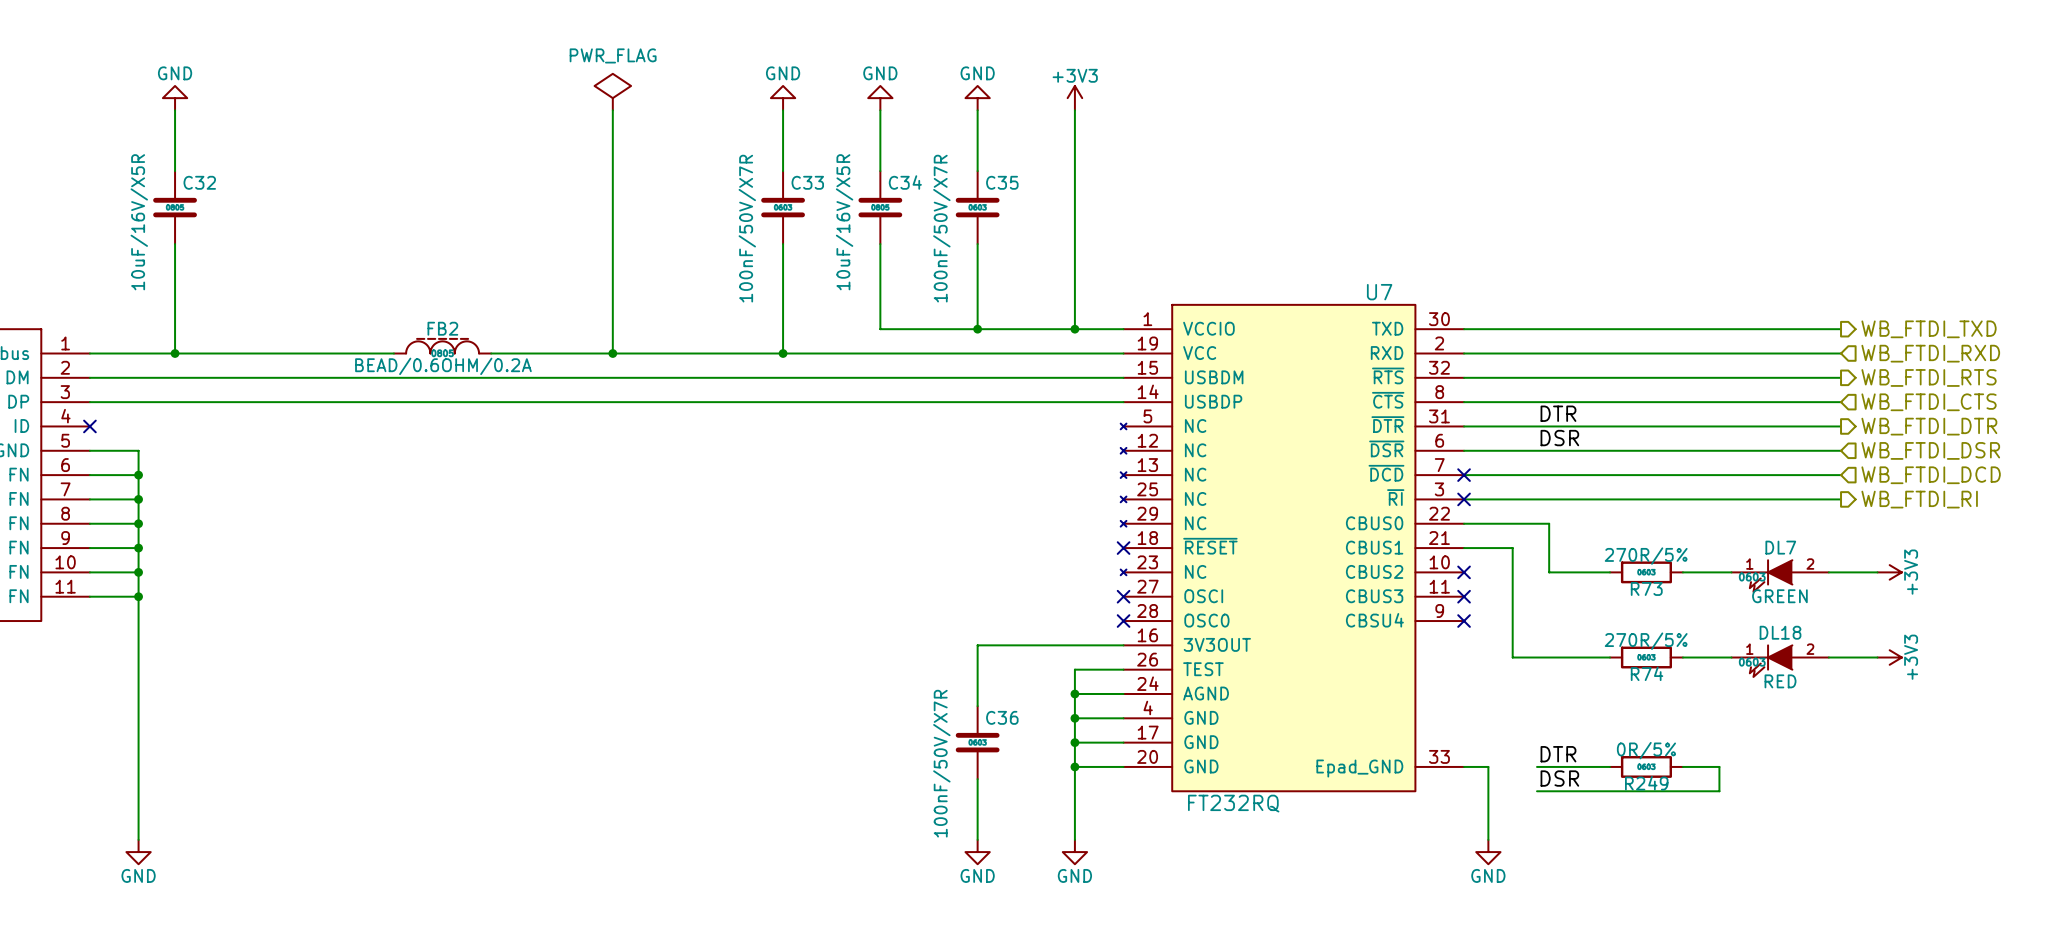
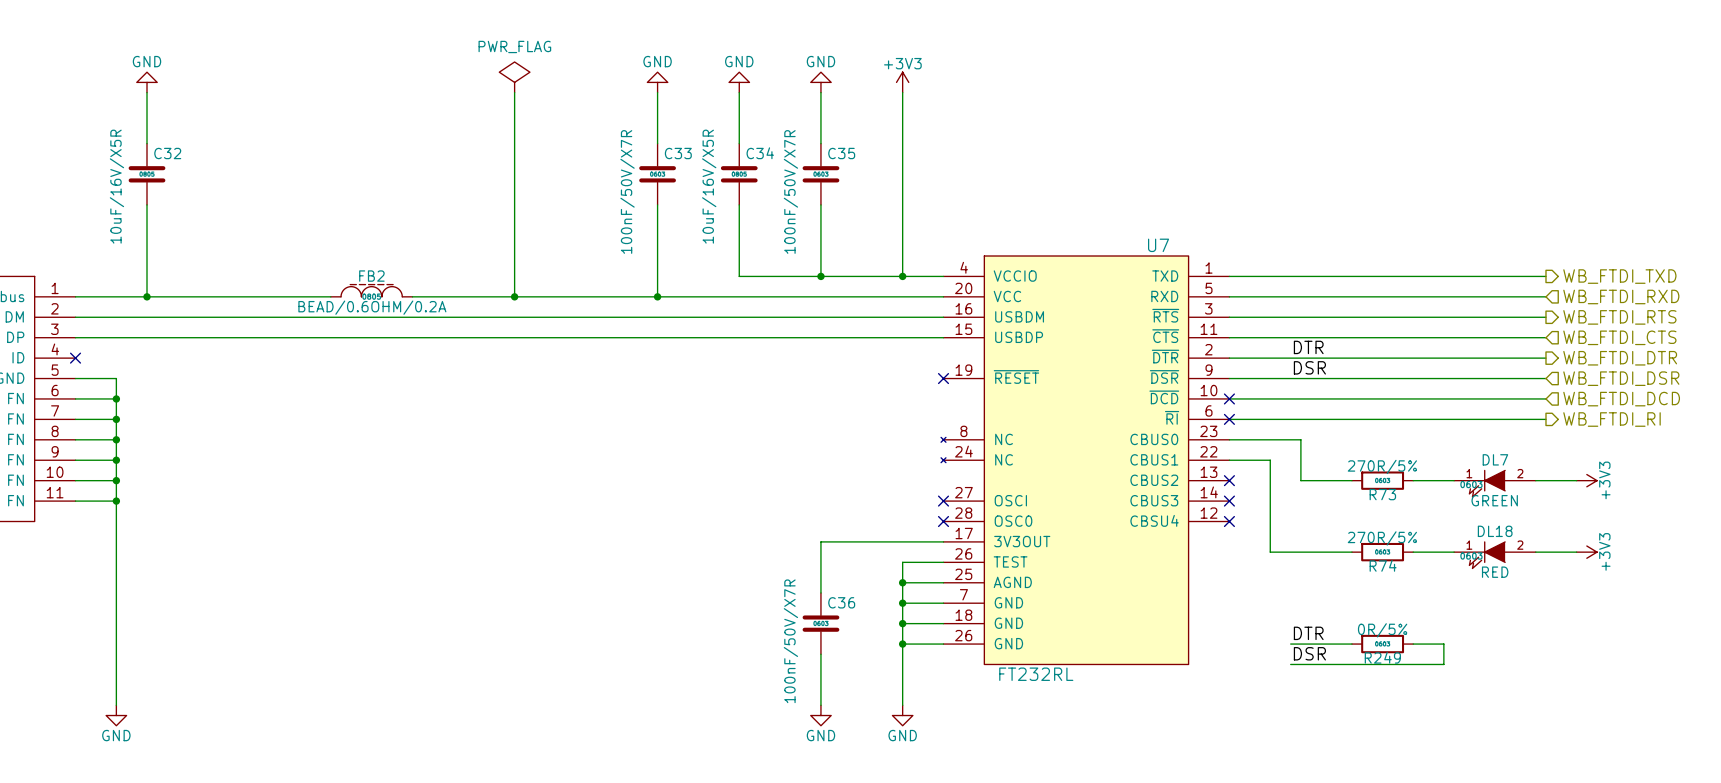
U7 symbol: [1120, 304, 1465, 792] -> [941, 256, 1230, 665]
no-connect mark: none -> (943, 378)
no-connect mark: (1123, 548) -> none
wire: (1464, 766) (1488, 766) (1488, 839) -> none
U7 value: FT232RQ (1233, 803) -> FT232RL (1036, 674)
power symbol: GND (1488, 852) -> none

